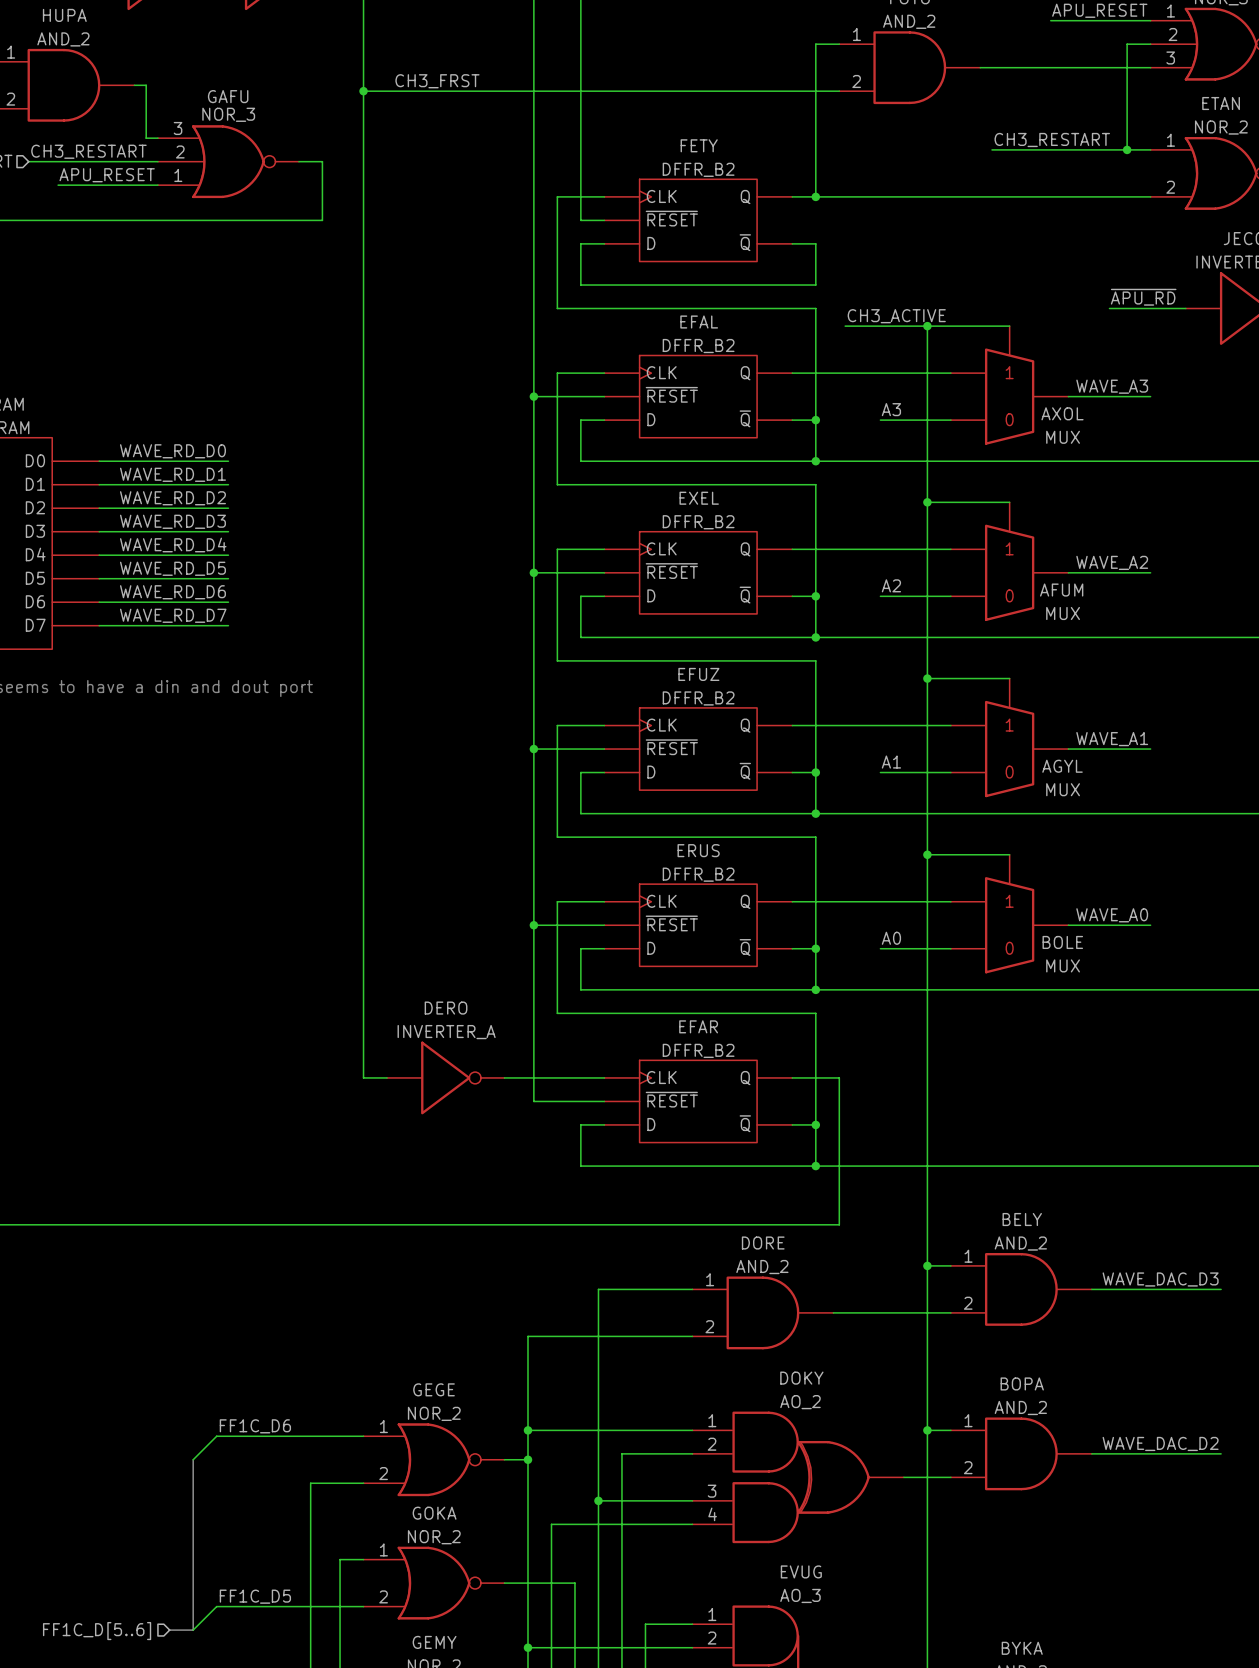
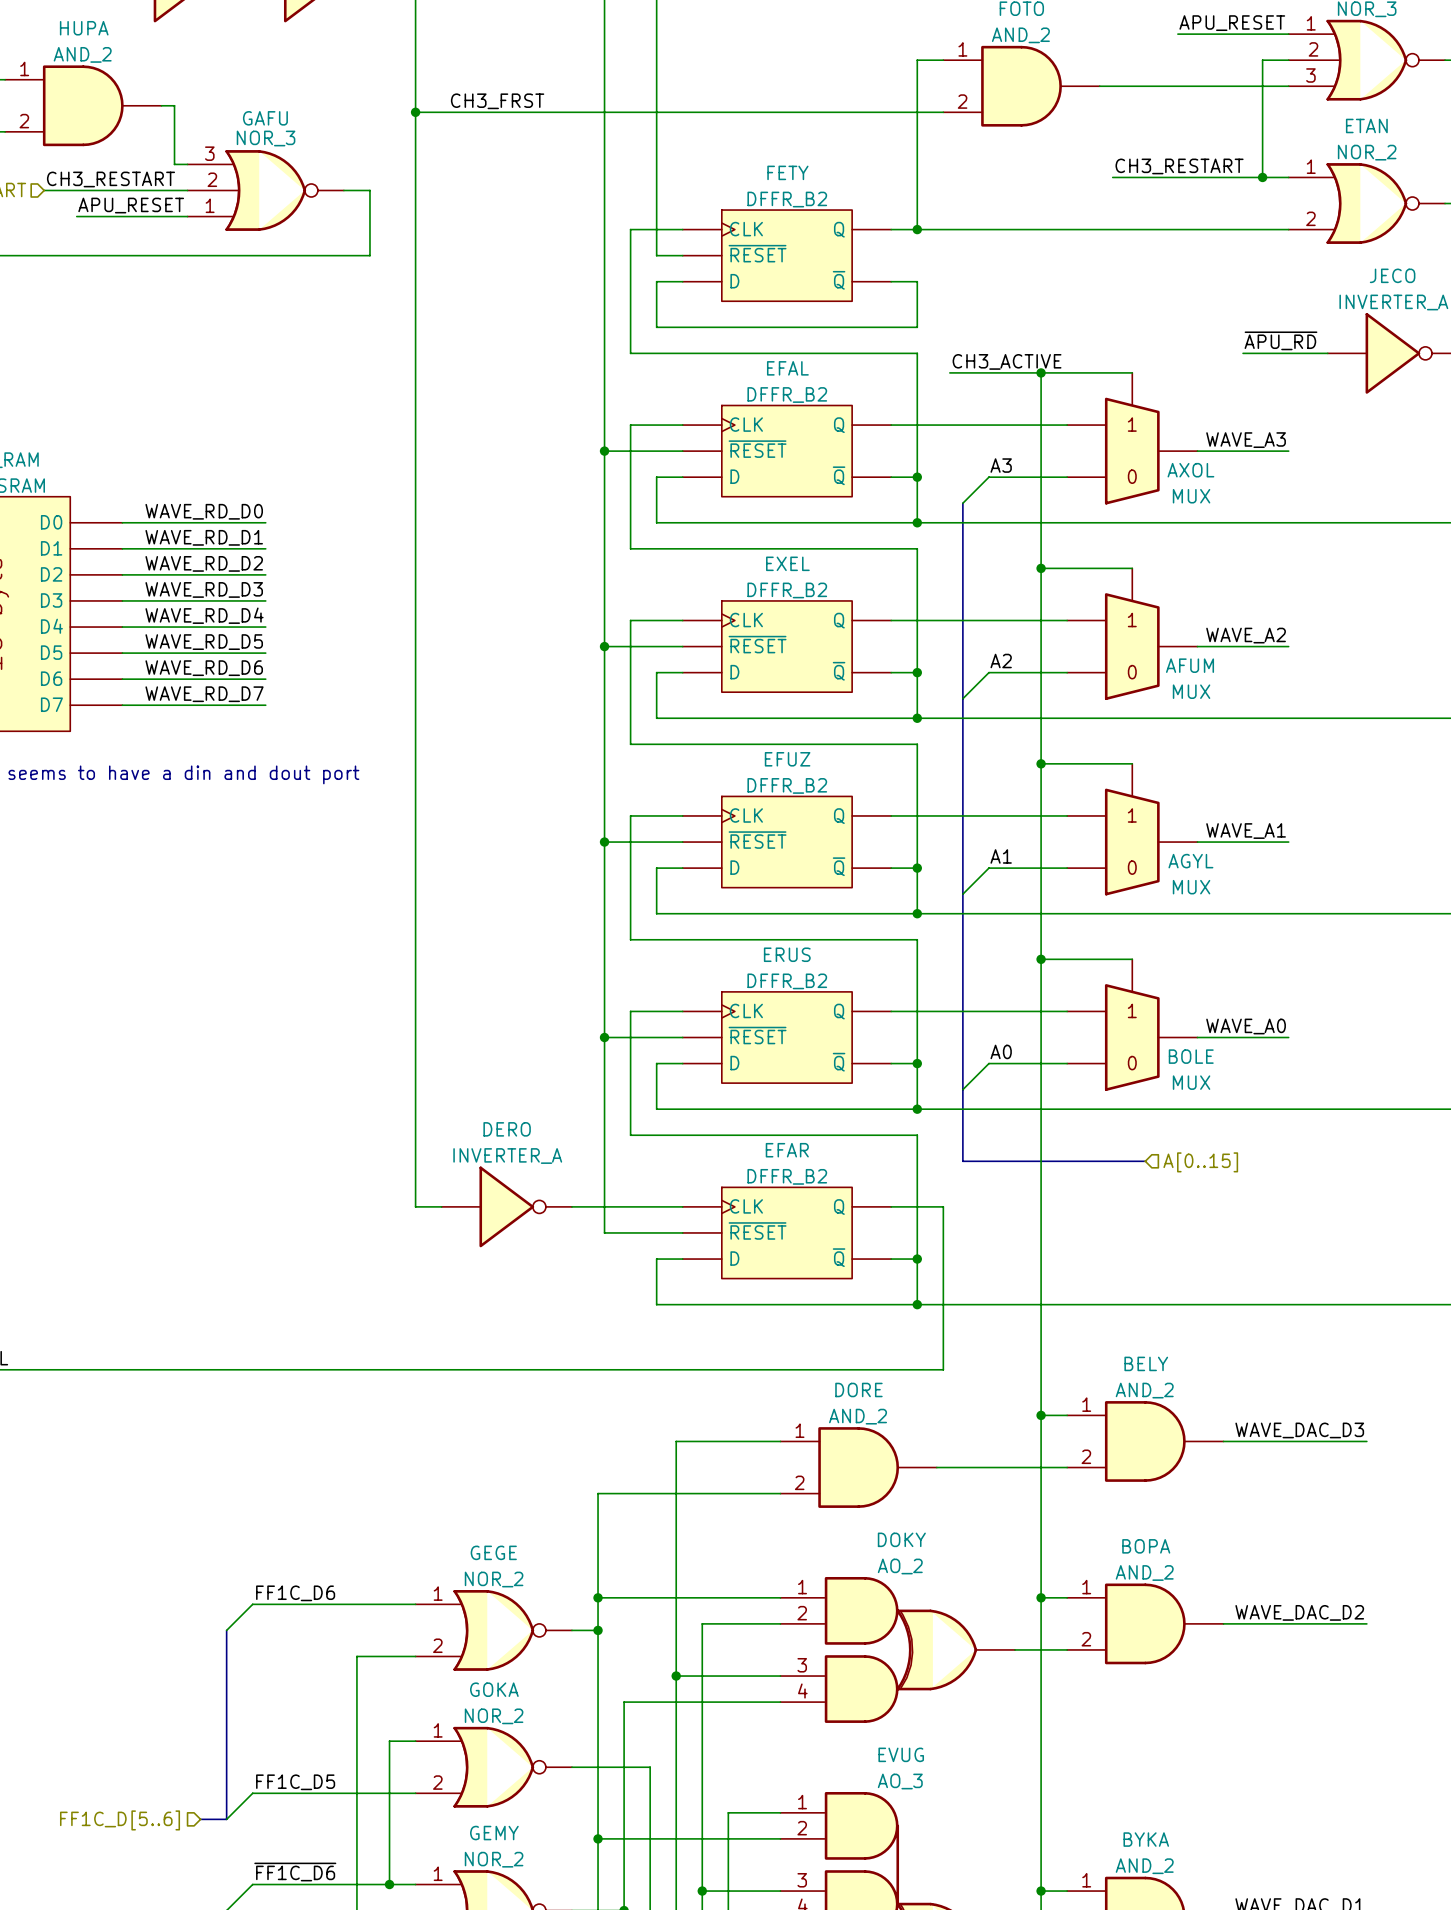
wire: none -> (988, 477) (962, 503)
bus: none -> (962, 503) (962, 1161) (1145, 1161)
wire: none -> (988, 672) (962, 698)
wire: none -> (988, 868) (962, 894)
wire: none -> (988, 1063) (962, 1089)
hierarchical label: none -> A[0..15] (1200, 1162)

